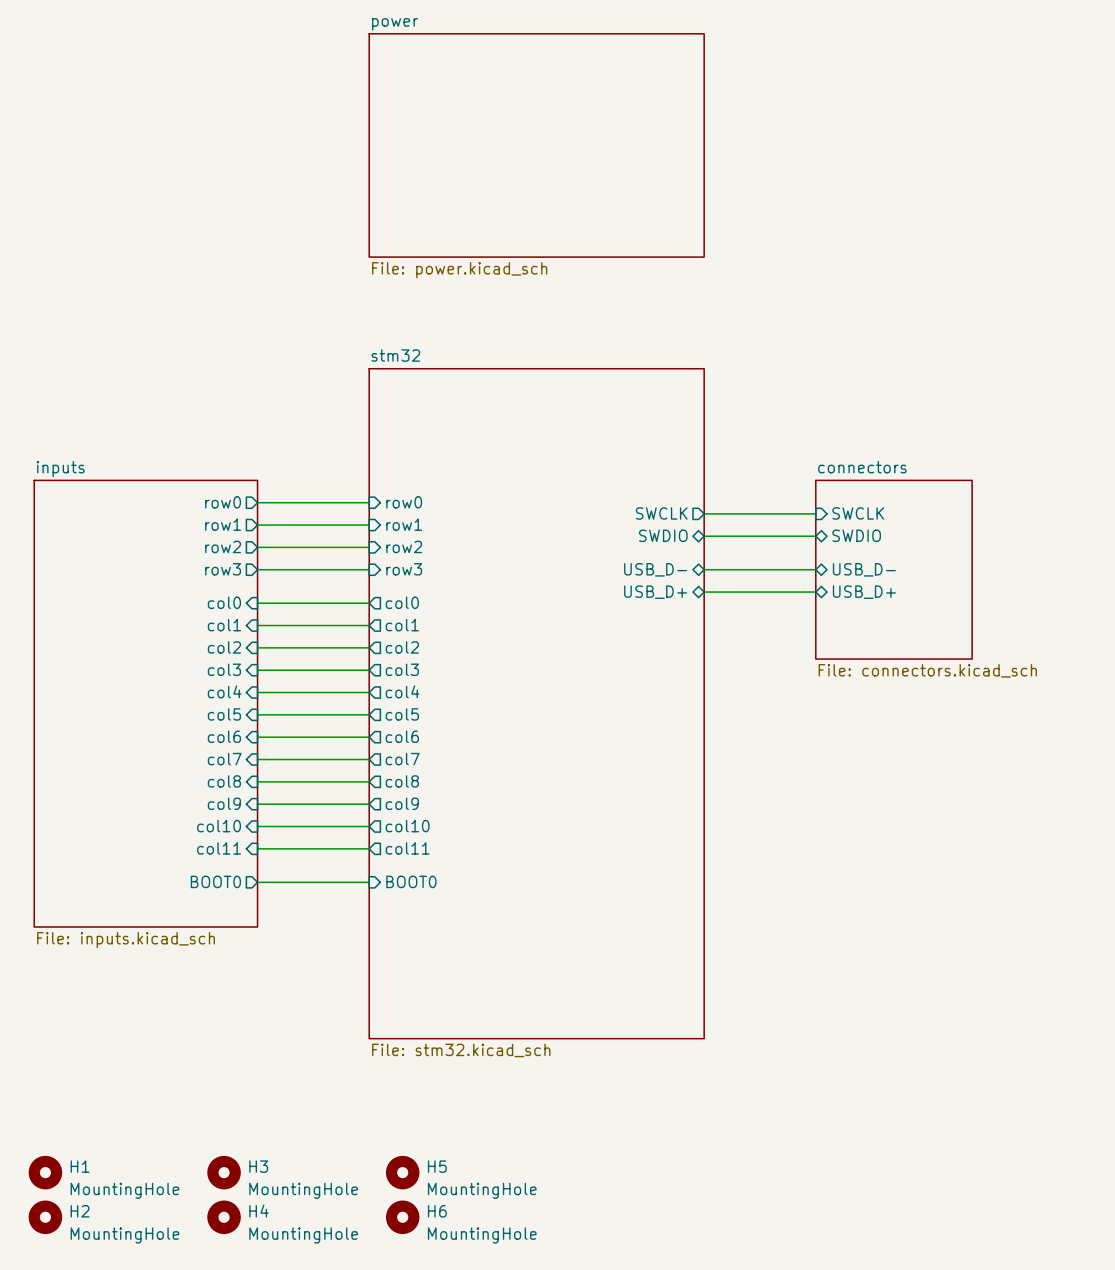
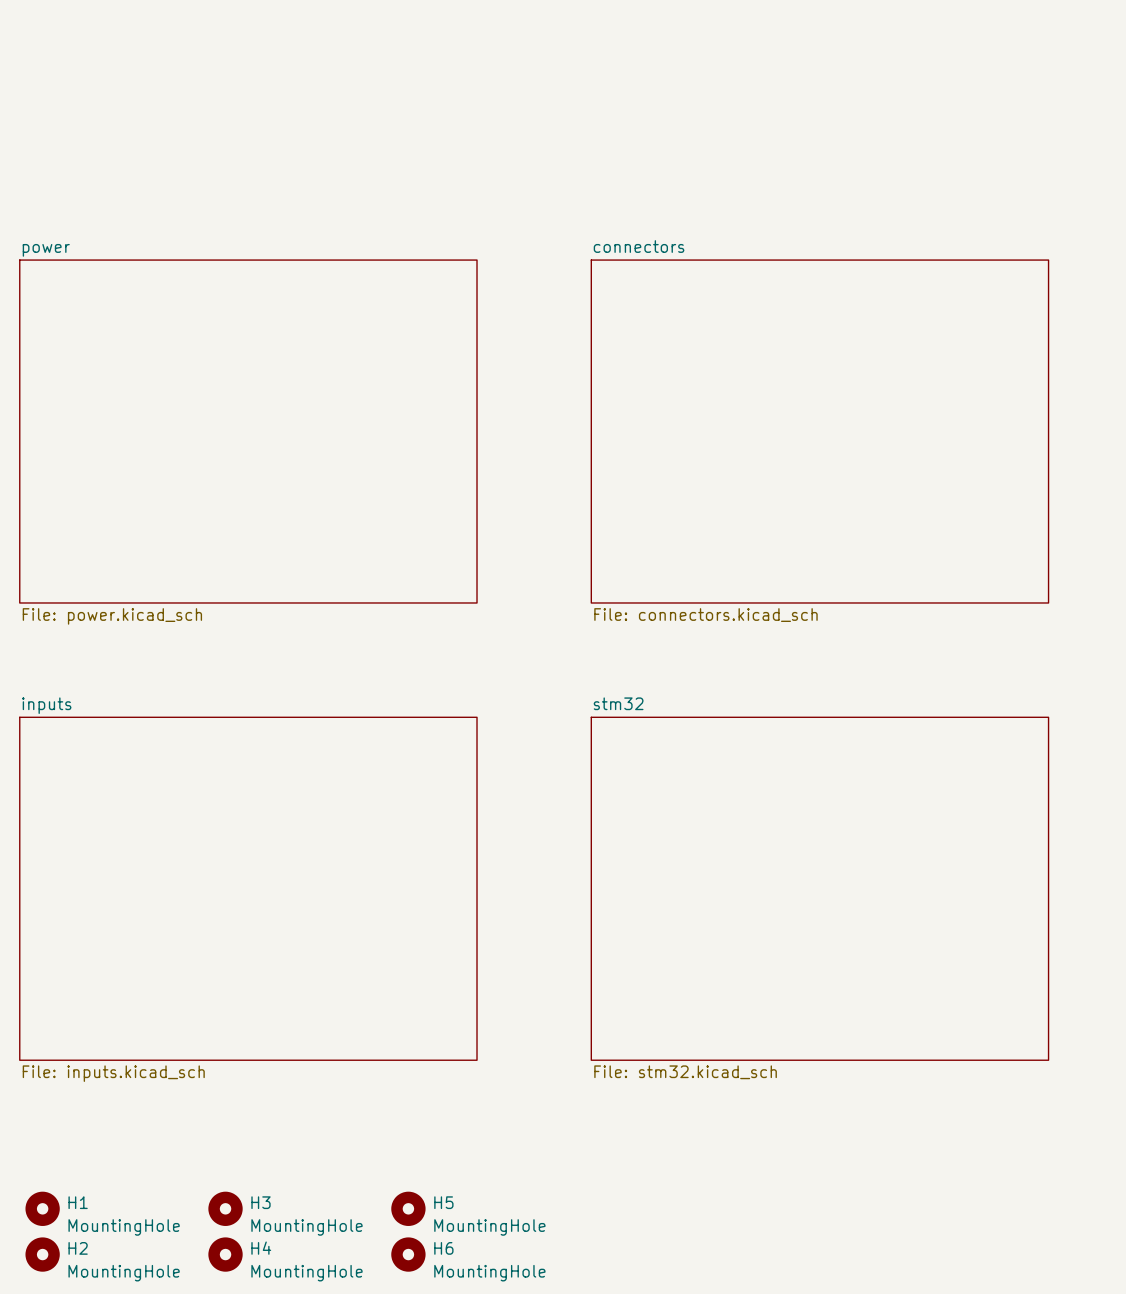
sheet power: File: power.kicad_sch (536, 145) -> none
sheet stm32 name position: stm32 (395, 355) -> stm32 (618, 703)
sheet stm32 shape: [368, 368, 705, 1040] -> [590, 716, 1050, 1061]
sheet power: none -> File: power.kicad_sch (248, 431)
sheet connectors: none -> File: connectors.kicad_sch (819, 431)
sheet pin: row0 (223, 502) -> none
wire: (257, 502) (369, 502) -> none
sheet pin: row0 (404, 502) -> none
sheet pin: SWCLK (661, 513) -> none
wire: (704, 513) (815, 513) -> none
sheet pin: SWCLK (858, 513) -> none
sheet pin: row1 (223, 524) -> none
sheet pin: row1 (404, 524) -> none
wire: (257, 525) (369, 525) -> none
sheet pin: SWDIO (663, 535) -> none
sheet pin: SWDIO (856, 535) -> none
wire: (704, 536) (815, 536) -> none
sheet pin: row2 (223, 546) -> none
sheet pin: row2 (404, 546) -> none
wire: (257, 547) (369, 547) -> none
sheet pin: row3 (223, 569) -> none
wire: (257, 569) (369, 569) -> none
sheet pin: row3 (404, 569) -> none
sheet pin: USB_D- (655, 569) -> none
wire: (704, 569) (815, 569) -> none
sheet pin: USB_D- (864, 569) -> none
sheet connectors: File: connectors.kicad_sch (893, 569) -> none
sheet pin: USB_D+ (655, 592) -> none
wire: (704, 592) (815, 592) -> none
sheet pin: USB_D+ (864, 592) -> none
sheet pin: col0 (224, 602) -> none
sheet pin: col0 (402, 602) -> none
wire: (257, 603) (369, 603) -> none
sheet pin: col1 (224, 625) -> none
wire: (257, 625) (369, 625) -> none
sheet pin: col1 (402, 625) -> none
sheet pin: col2 (224, 647) -> none
wire: (257, 647) (369, 647) -> none
sheet pin: col2 (402, 647) -> none
sheet pin: col3 (224, 669) -> none
sheet pin: col3 (402, 669) -> none
wire: (257, 670) (369, 670) -> none
sheet pin: col4 (224, 691) -> none
sheet pin: col4 (402, 691) -> none
sheet inputs: File: inputs.kicad_sch (145, 703) -> none
sheet pin: col5 (224, 714) -> none
wire: (257, 714) (369, 714) -> none
sheet pin: col5 (402, 714) -> none
sheet pin: col6 (224, 736) -> none
sheet pin: col6 (402, 736) -> none
wire: (257, 737) (369, 737) -> none
sheet pin: col7 (224, 759) -> none
wire: (257, 759) (369, 759) -> none
sheet pin: col7 (402, 759) -> none
sheet pin: col8 (224, 781) -> none
wire: (257, 781) (369, 781) -> none
sheet pin: col8 (402, 781) -> none
sheet pin: col9 (224, 803) -> none
sheet pin: col9 (402, 803) -> none
wire: (257, 804) (369, 804) -> none
sheet pin: col10 (219, 826) -> none
wire: (257, 826) (369, 826) -> none
sheet pin: col10 (407, 826) -> none
sheet pin: col11 (219, 848) -> none
wire: (257, 848) (369, 848) -> none
sheet pin: col11 (407, 848) -> none
sheet inputs: none -> File: inputs.kicad_sch (248, 888)
sheet pin: BOOT0 (215, 881) -> none
sheet pin: BOOT0 (411, 881) -> none
wire: (257, 882) (369, 882) -> none
sheet stm32 value position: File: stm32.kicad_sch (461, 1050) -> File: stm32.kicad_sch (685, 1072)

